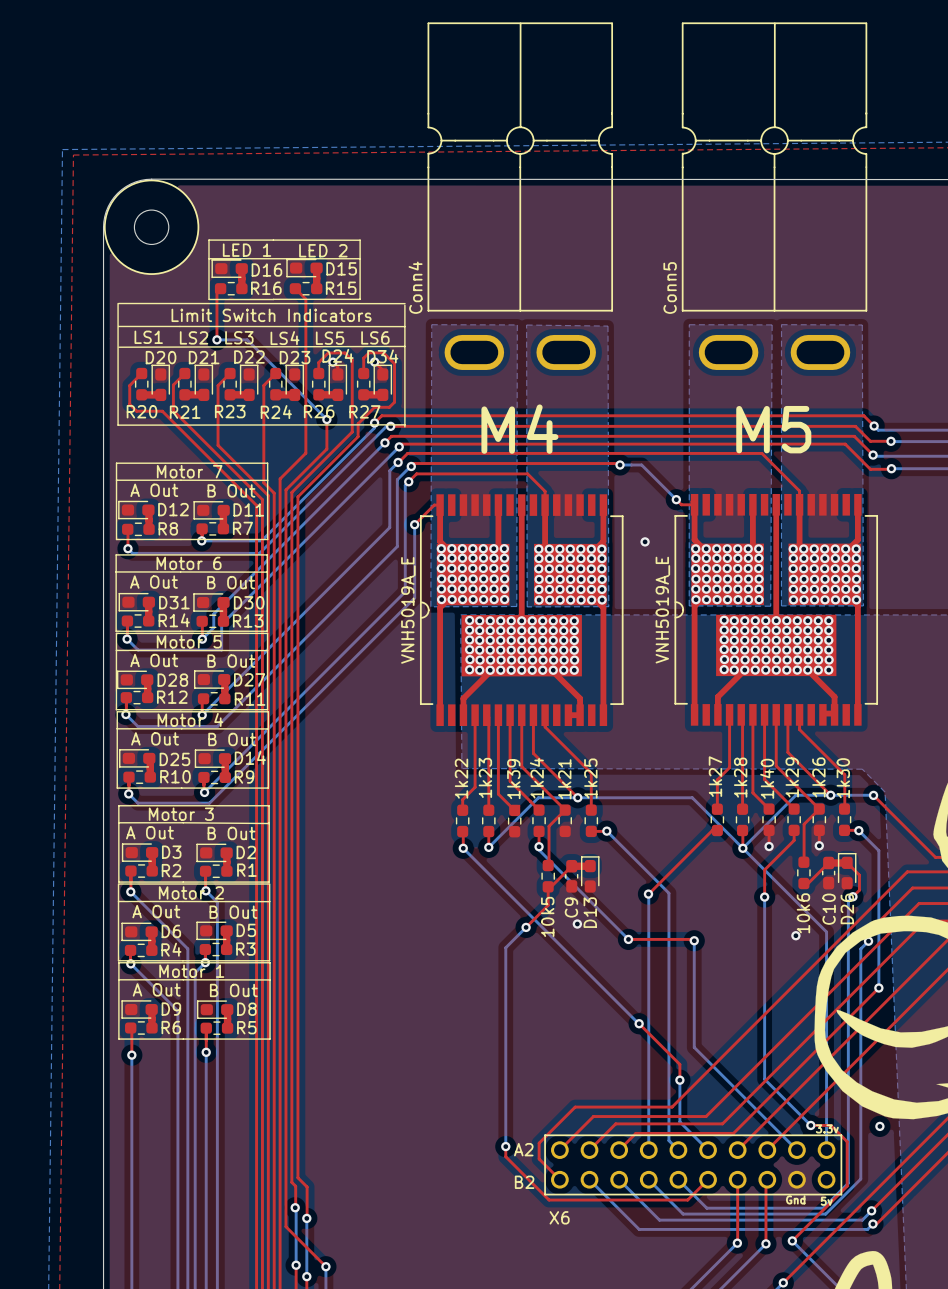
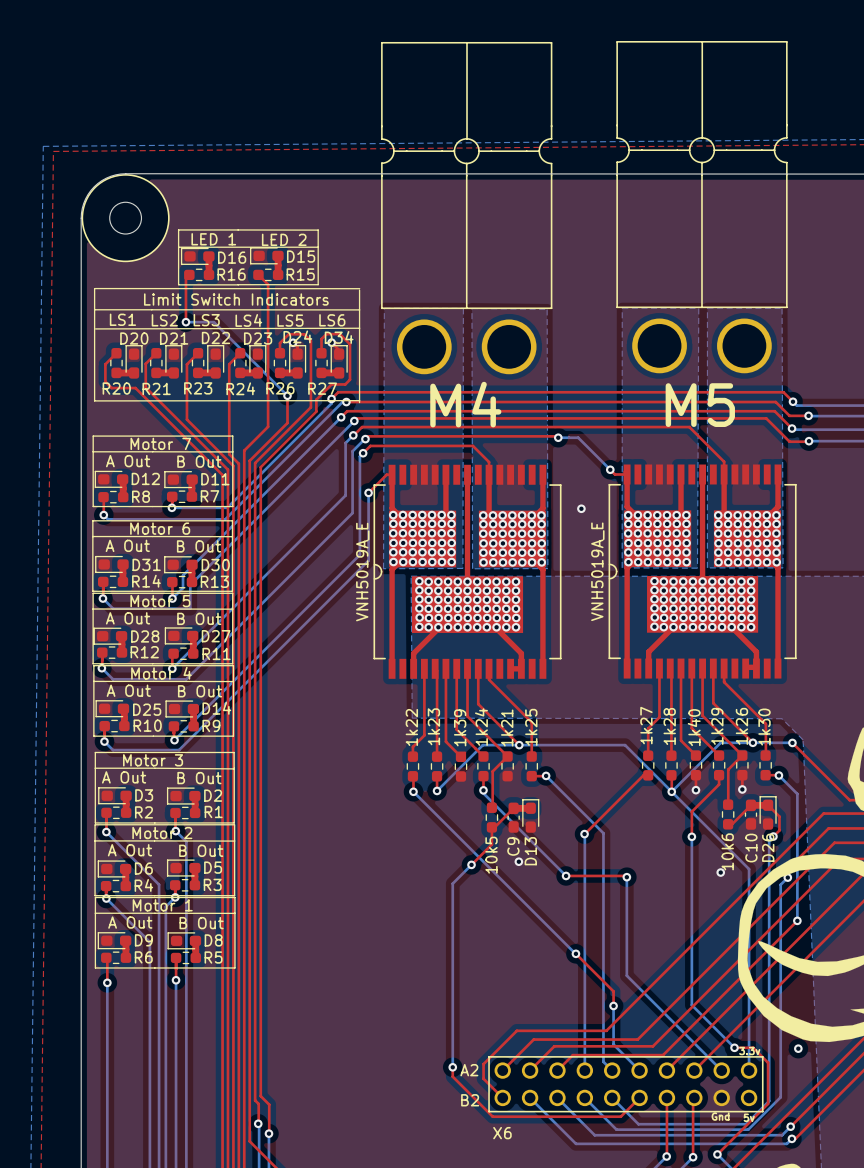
Conn4: (520, 196) -> none
Conn5: (774, 196) -> none
part: none -> (701, 207)
part: none -> (466, 208)

